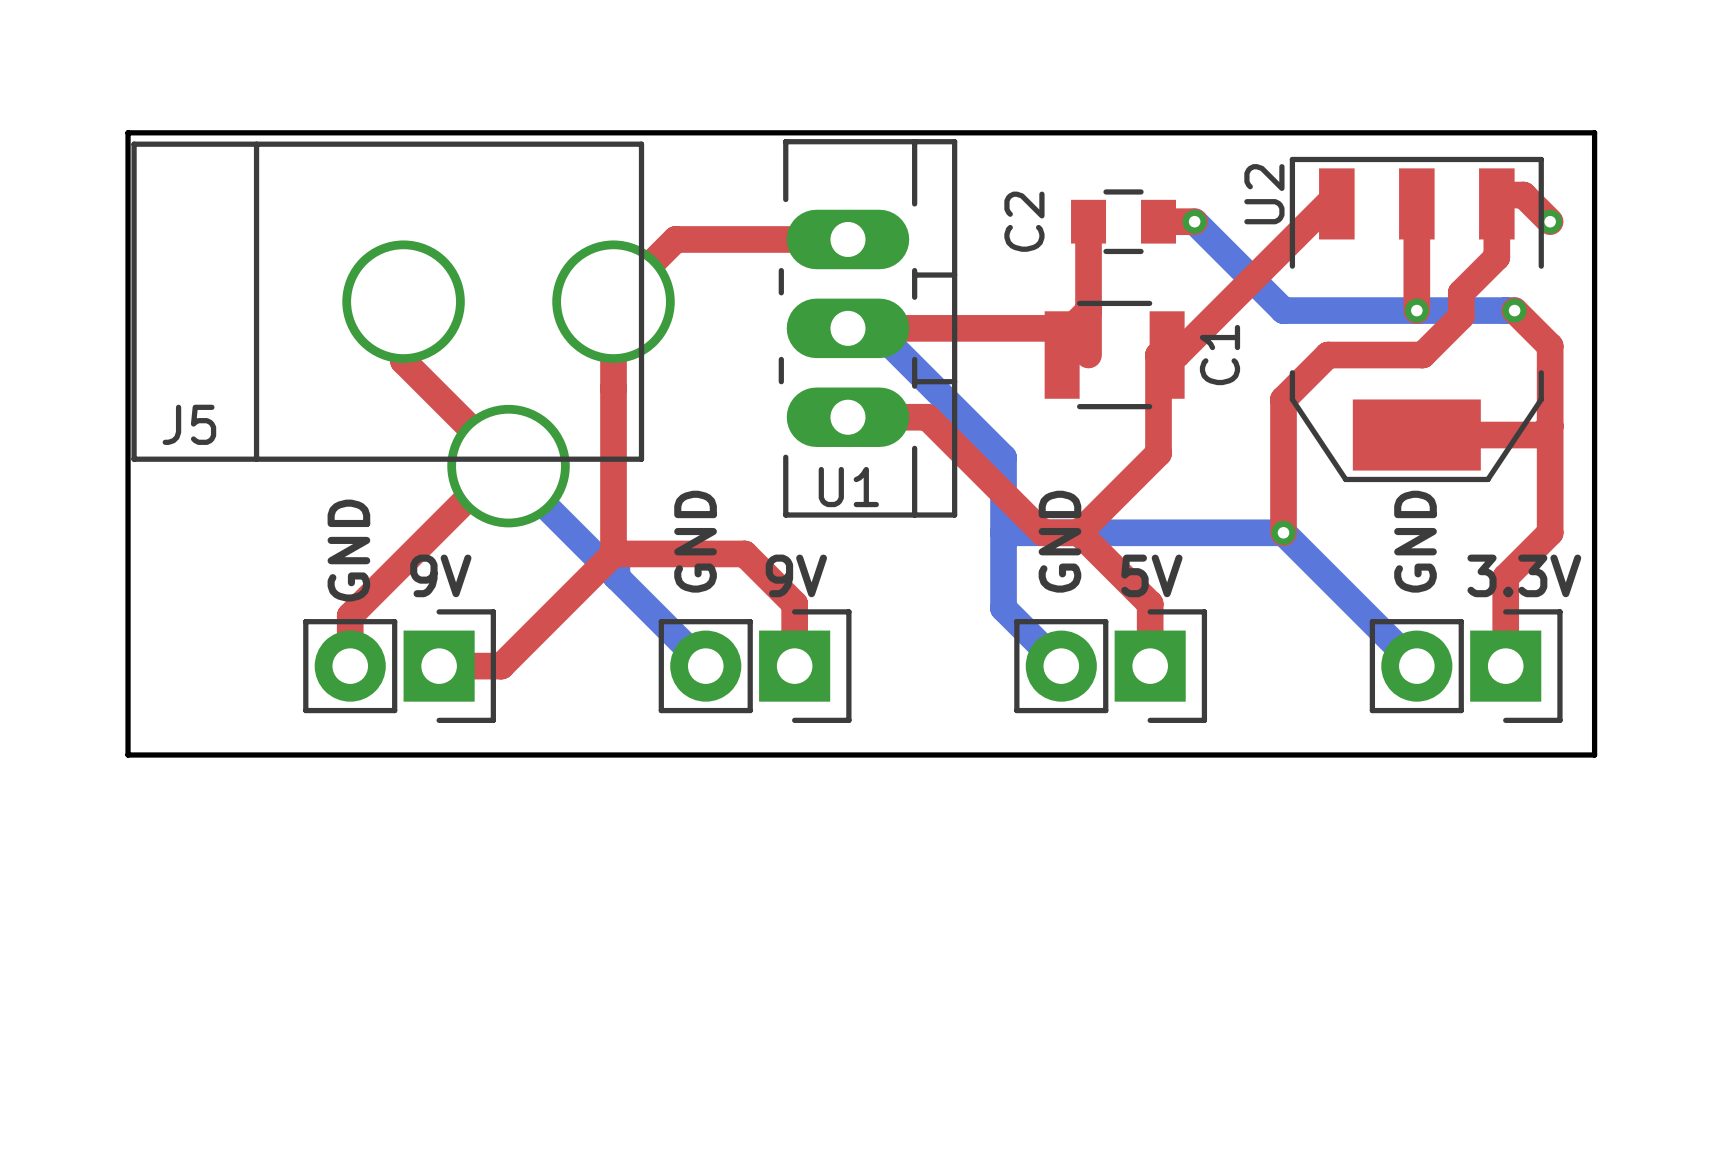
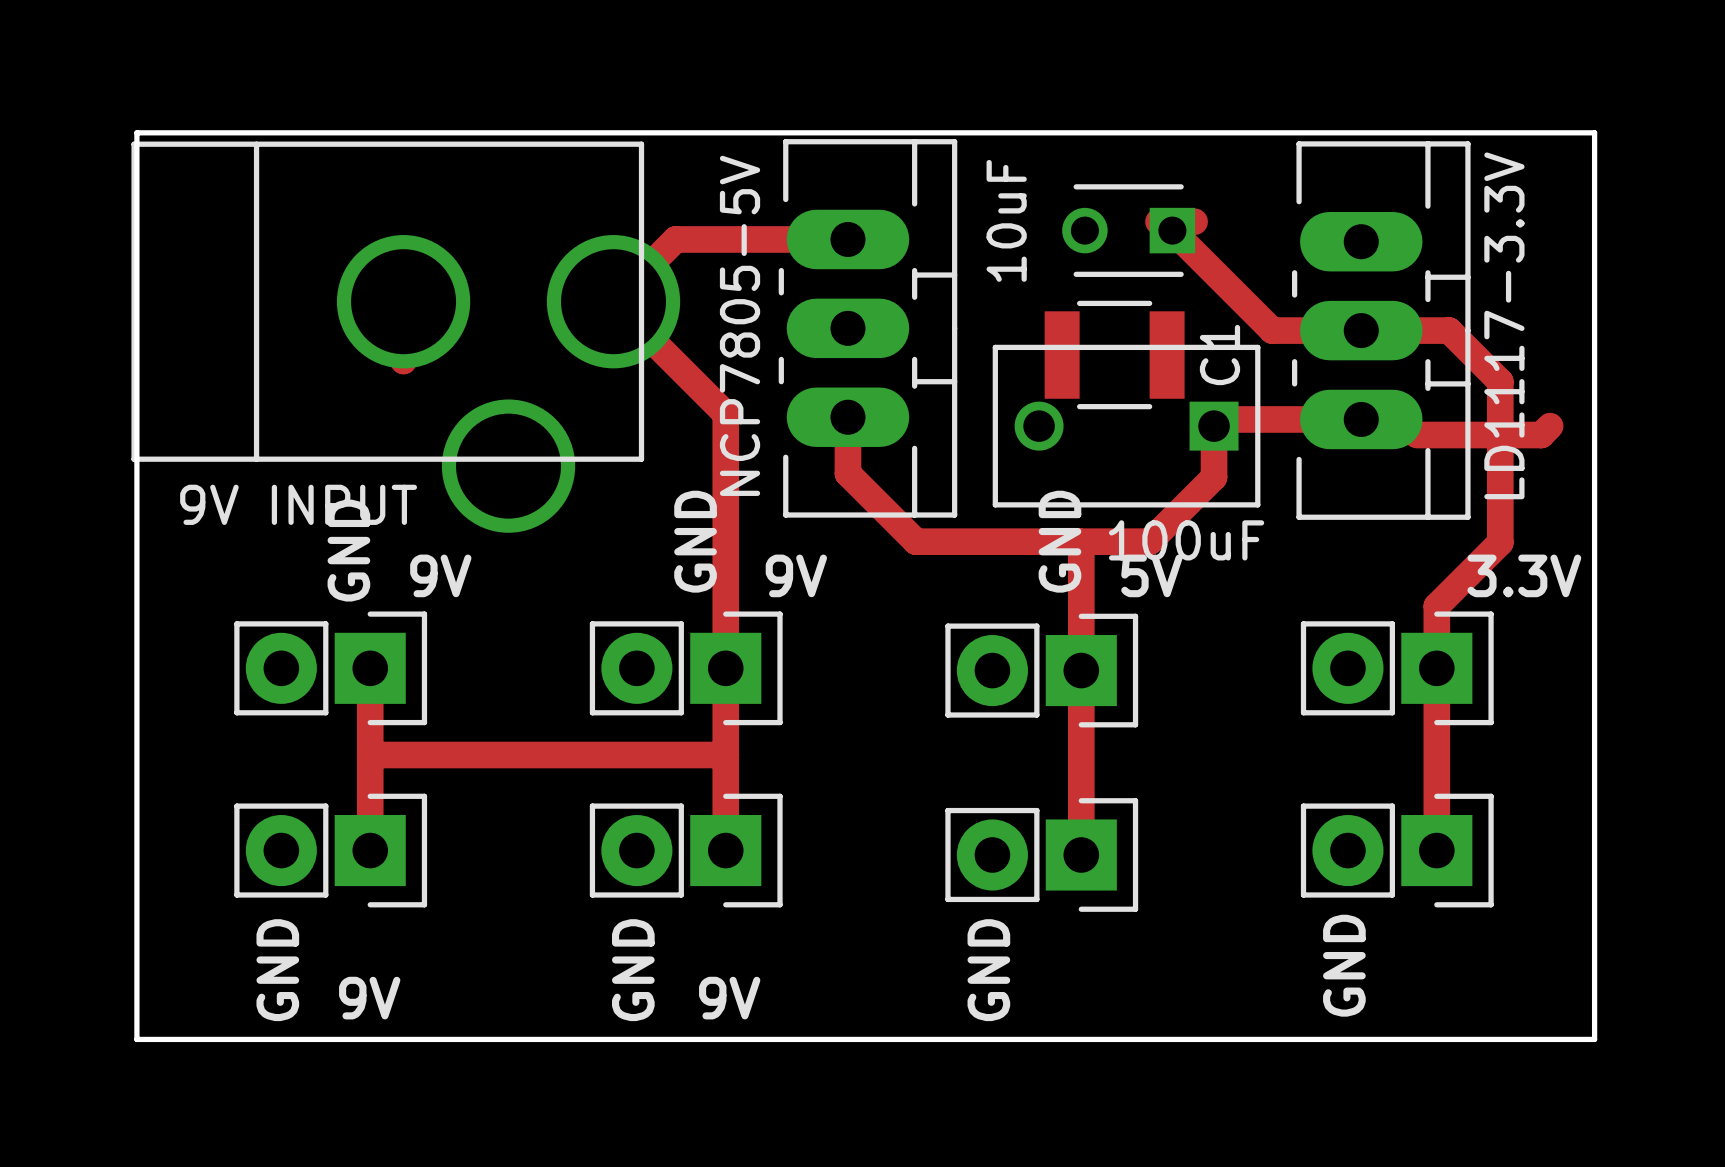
board edge: (136, 132) (128, 132) (128, 755) (1594, 755) -> (136, 132) (136, 1039) (1594, 1039) (1594, 755)
top track: (1336, 195) (1176, 355) (1158, 355) (1158, 453) (1079, 532) -> none
top track: (1416, 195) (1416, 310) -> none
top track: (1088, 221) (1088, 355) -> none
C2: (1123, 221) -> none
bottom track: (1194, 221) (1283, 310) (1514, 310) -> none
via: (1194, 221) -> none
top track: (1550, 221) (1523, 195) (1496, 195) (1496, 257) (1461, 292) (1461, 316) (1422, 355) (1327, 355) (1283, 399) (1283, 532) -> none
via: (1550, 221) -> none
10uF: none -> (1128, 230)
top track: none -> (1172, 230) (1272, 330) (1449, 330) (1500, 381) (1500, 542) (1436, 606) (1436, 850)
top track: (613, 301) (613, 553) -> (613, 301) (725, 413) (725, 850)
top track: (1088, 310) (1070, 328) (856, 328) -> none
via: (1416, 310) -> none
top track: (1514, 310) (1550, 346) (1550, 532) (1505, 577) (1505, 666) -> none
via: (1514, 310) -> none
U2: (1416, 319) -> none
bottom track: (839, 328) (874, 328) (1003, 457) (1003, 608) (1061, 666) -> none
LD1117-3.3V: none -> (1381, 330)
J5: (403, 334) -> none
9V INPUT: none -> (405, 337)
top track: (403, 361) (508, 466) -> none
top track: none -> (847, 417) (847, 473) (916, 541) (1149, 541) (1214, 477) (1214, 426) (1220, 419) (1361, 419)
top track: (856, 417) (927, 417) (1042, 532) (1079, 532) -> none
100uF: none -> (1126, 426)
top track: (499, 466) (350, 615) (350, 666) -> none
bottom track: (508, 468) (705, 666) -> none
U1 name: U1 (848, 487) -> NCP7805-5V (740, 325)
bottom track: (1003, 532) (1283, 532) (1416, 666) -> none
top track: (1079, 532) (1150, 603) (1150, 666) -> none
via: (1283, 532) -> none
top track: none -> (1079, 541) (1081, 543) (1081, 854)
text: GND (1415, 541) -> none
top track: (613, 553) (744, 553) (794, 603) (794, 666) -> none
top track: (613, 553) (501, 666) (439, 666) -> none
part position: (399, 666) -> (330, 668)
part position: (755, 666) -> (686, 668)
part position: (1110, 666) -> (1041, 670)
part position: (1466, 666) -> (1397, 668)
top track: none -> (370, 668) (370, 850)
top track: none -> (370, 755) (725, 755)
part: none -> (330, 850)
part: none -> (686, 850)
part: none -> (1397, 850)
part: none -> (1041, 854)
text: none -> GND (1344, 965)
text: none -> GND (277, 970)
text: none -> GND (633, 970)
text: none -> GND (988, 970)
text: none -> 9V (369, 998)
text: none -> 9V (729, 998)

